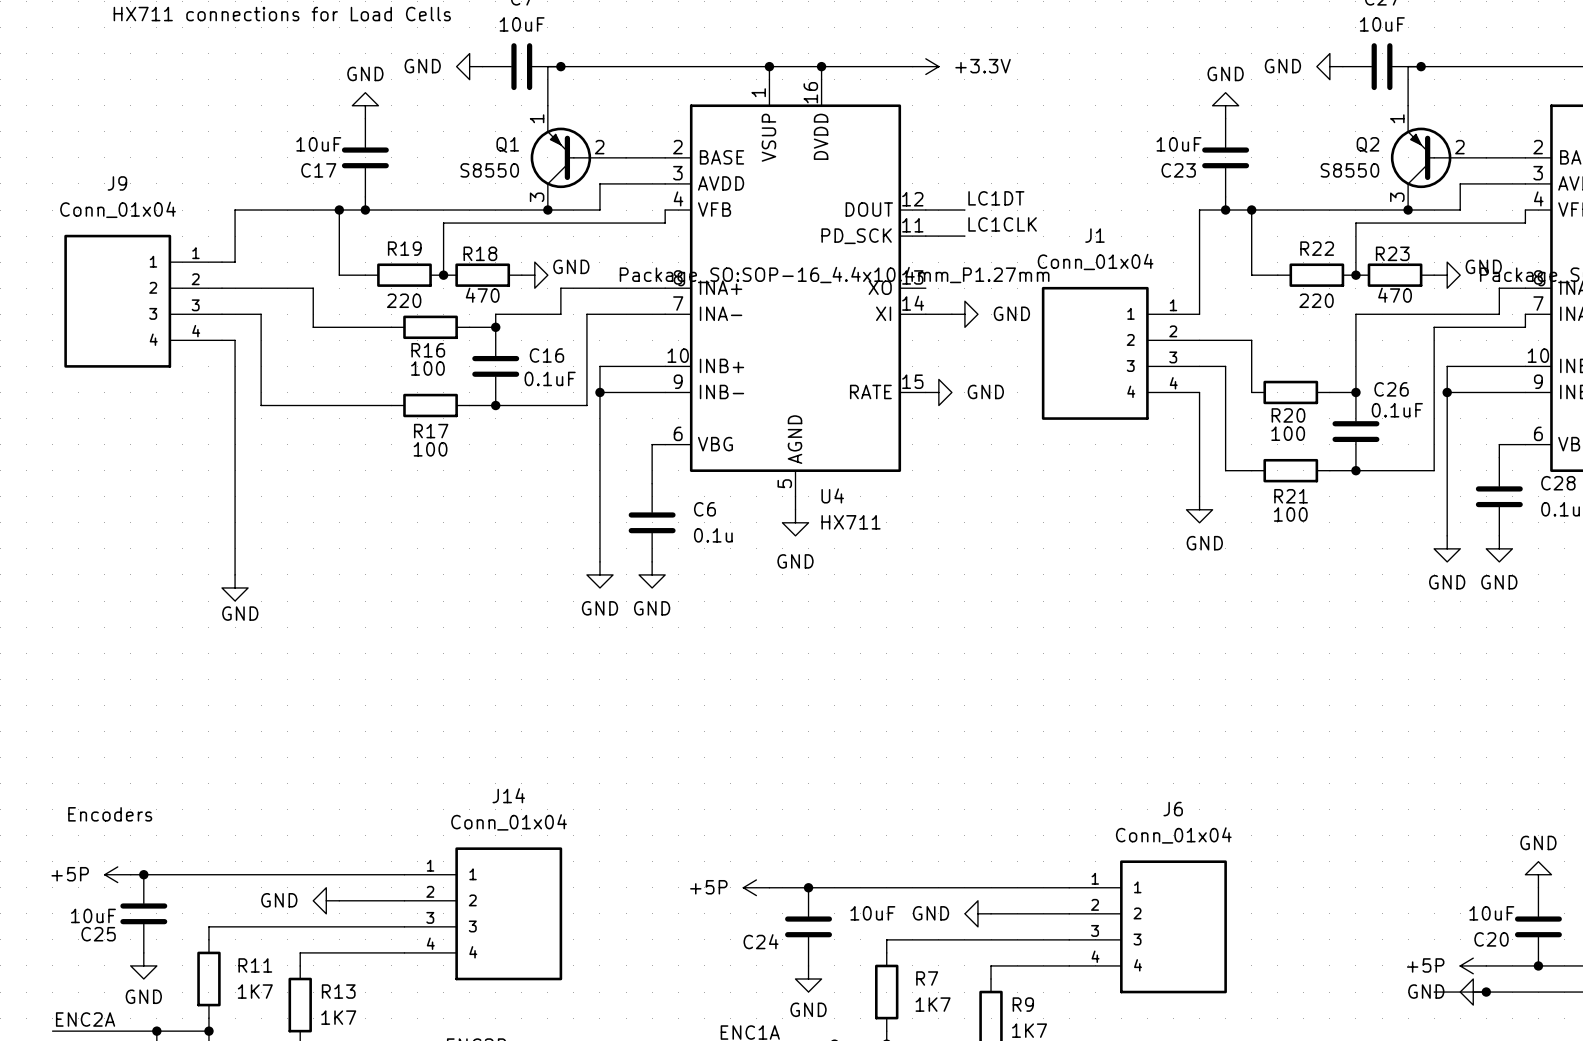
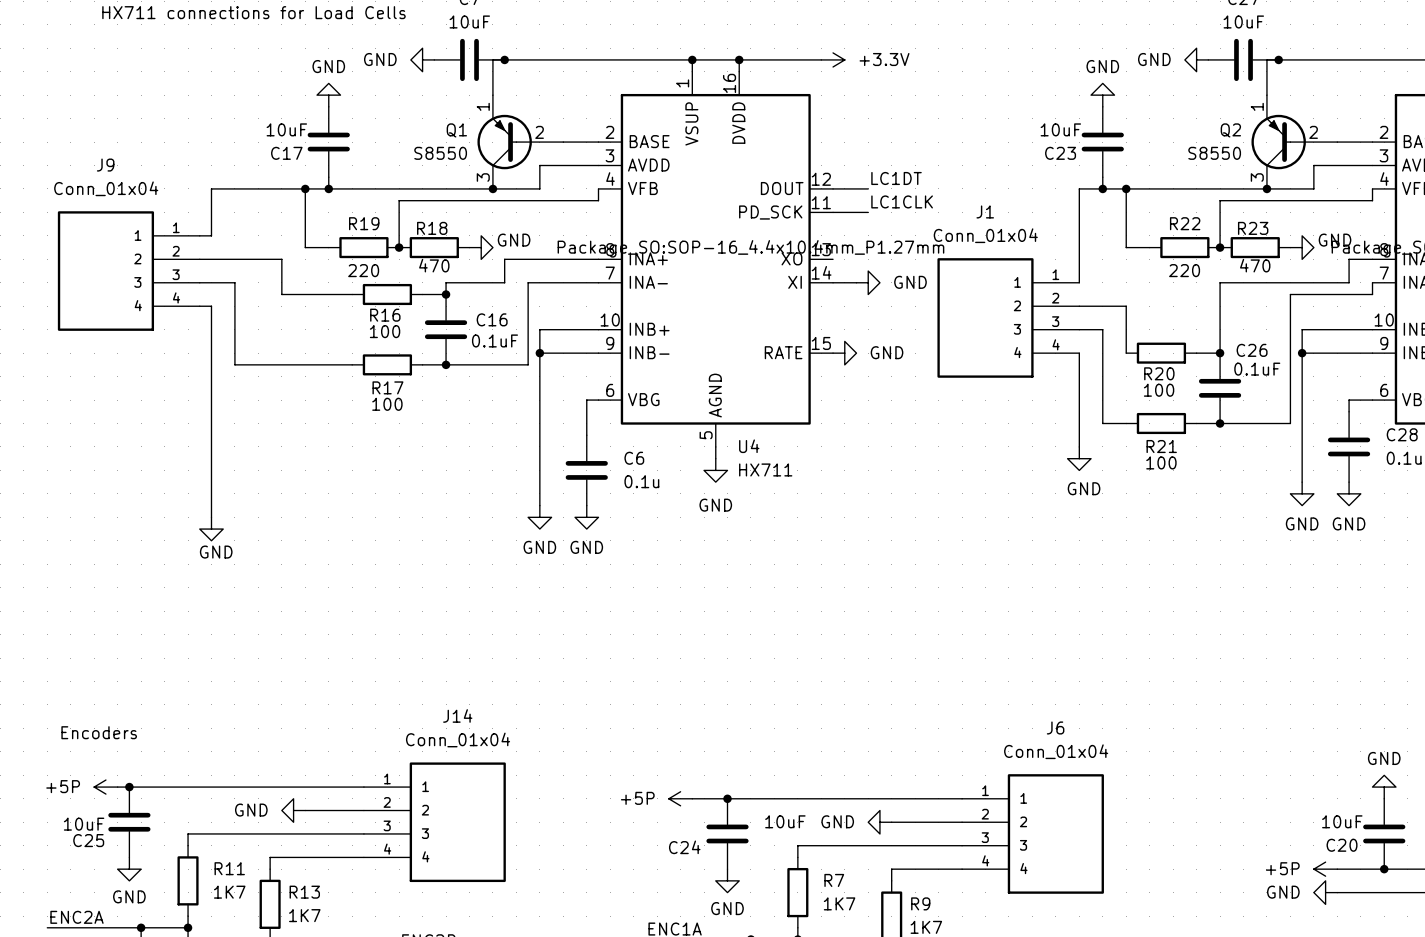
wire: (1434, 992) (1486, 992) -> none
junction: (1486, 992) -> none

